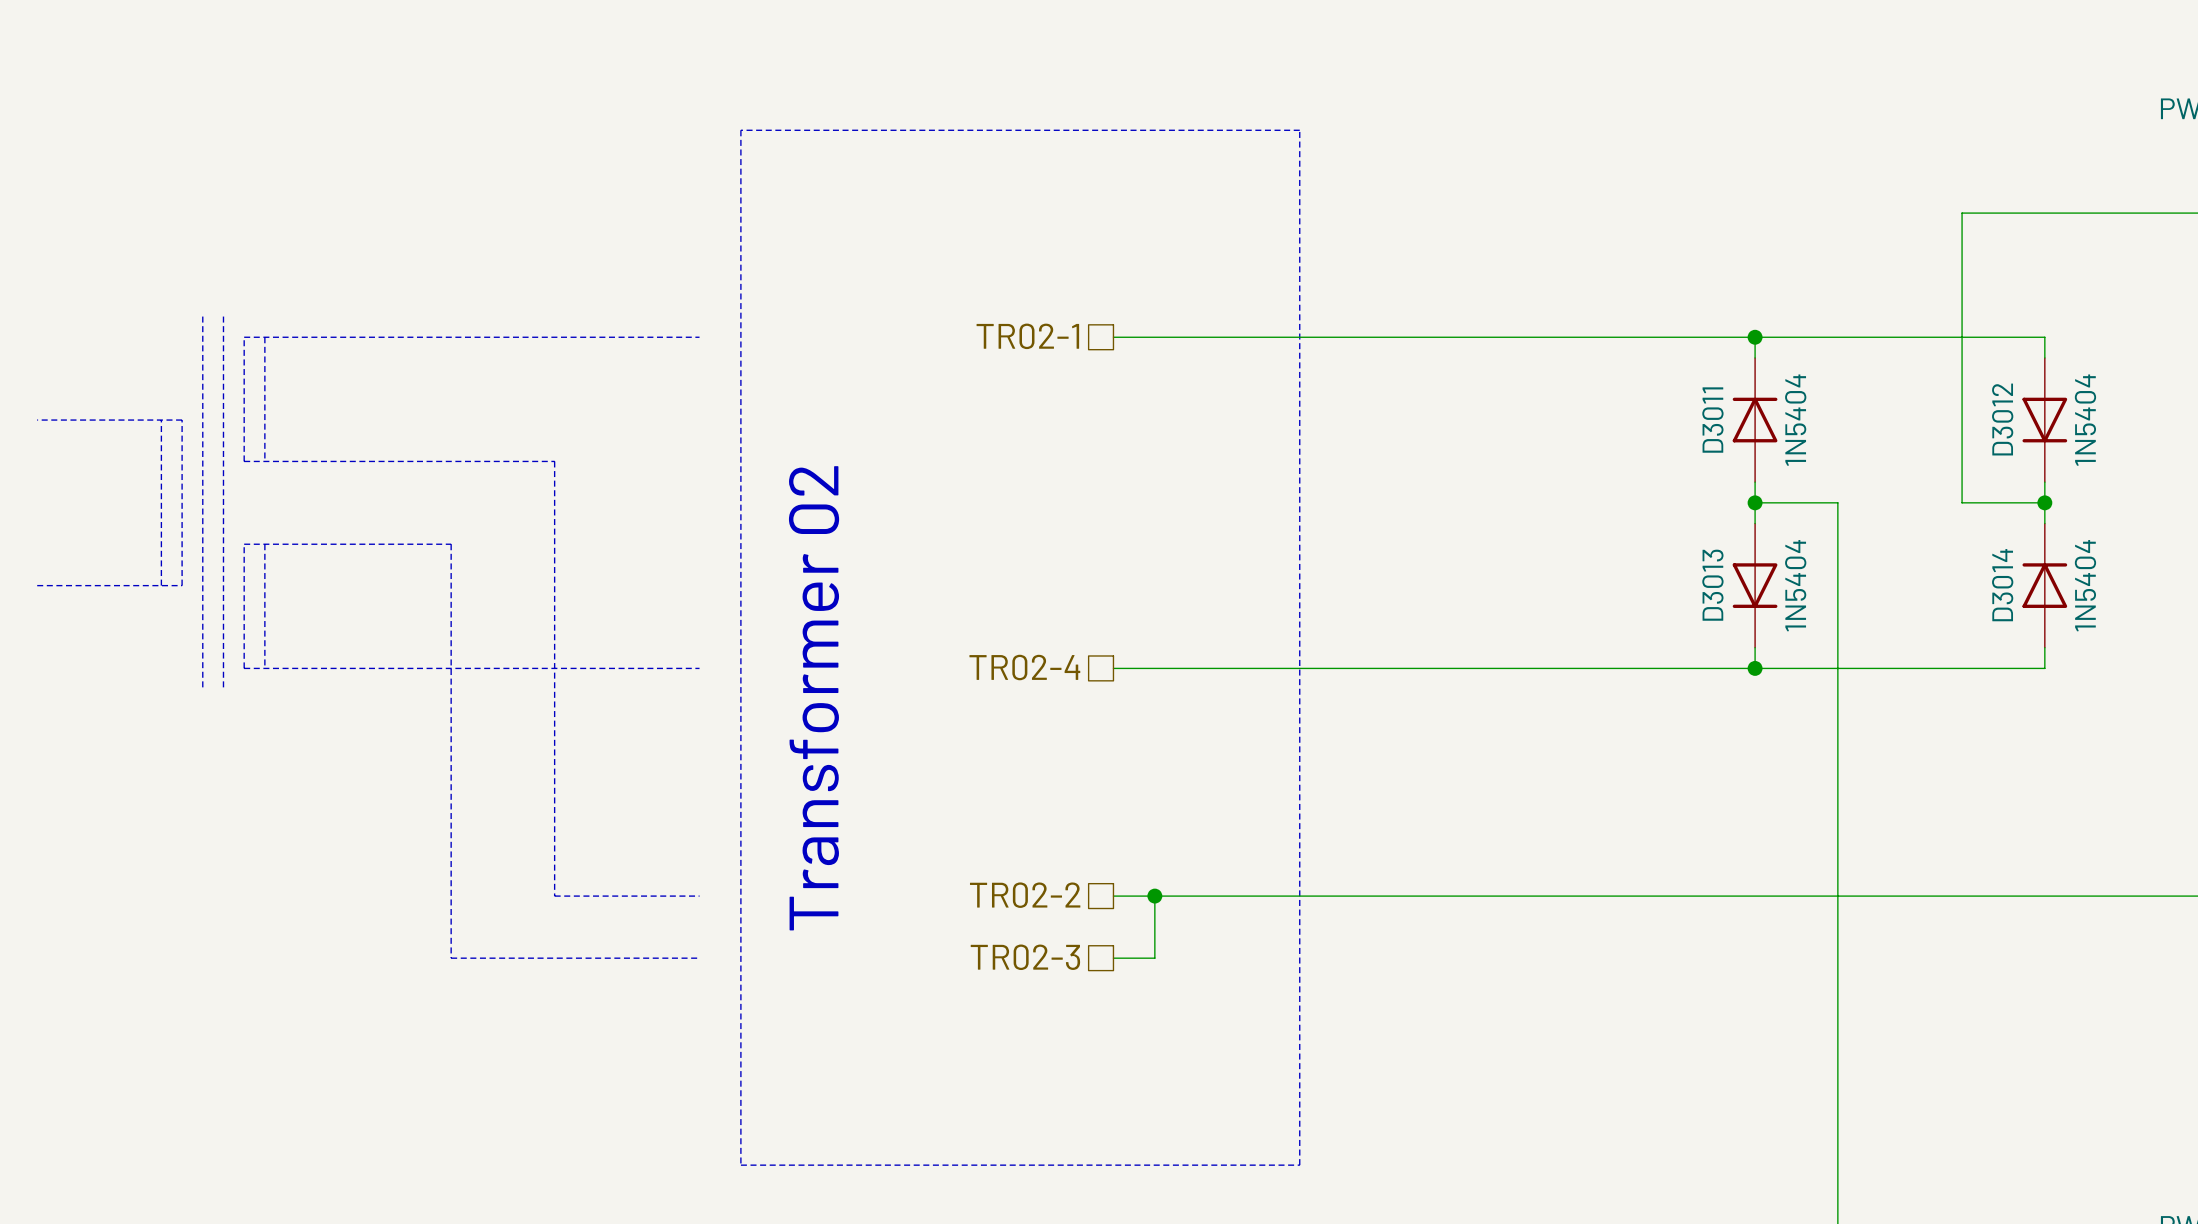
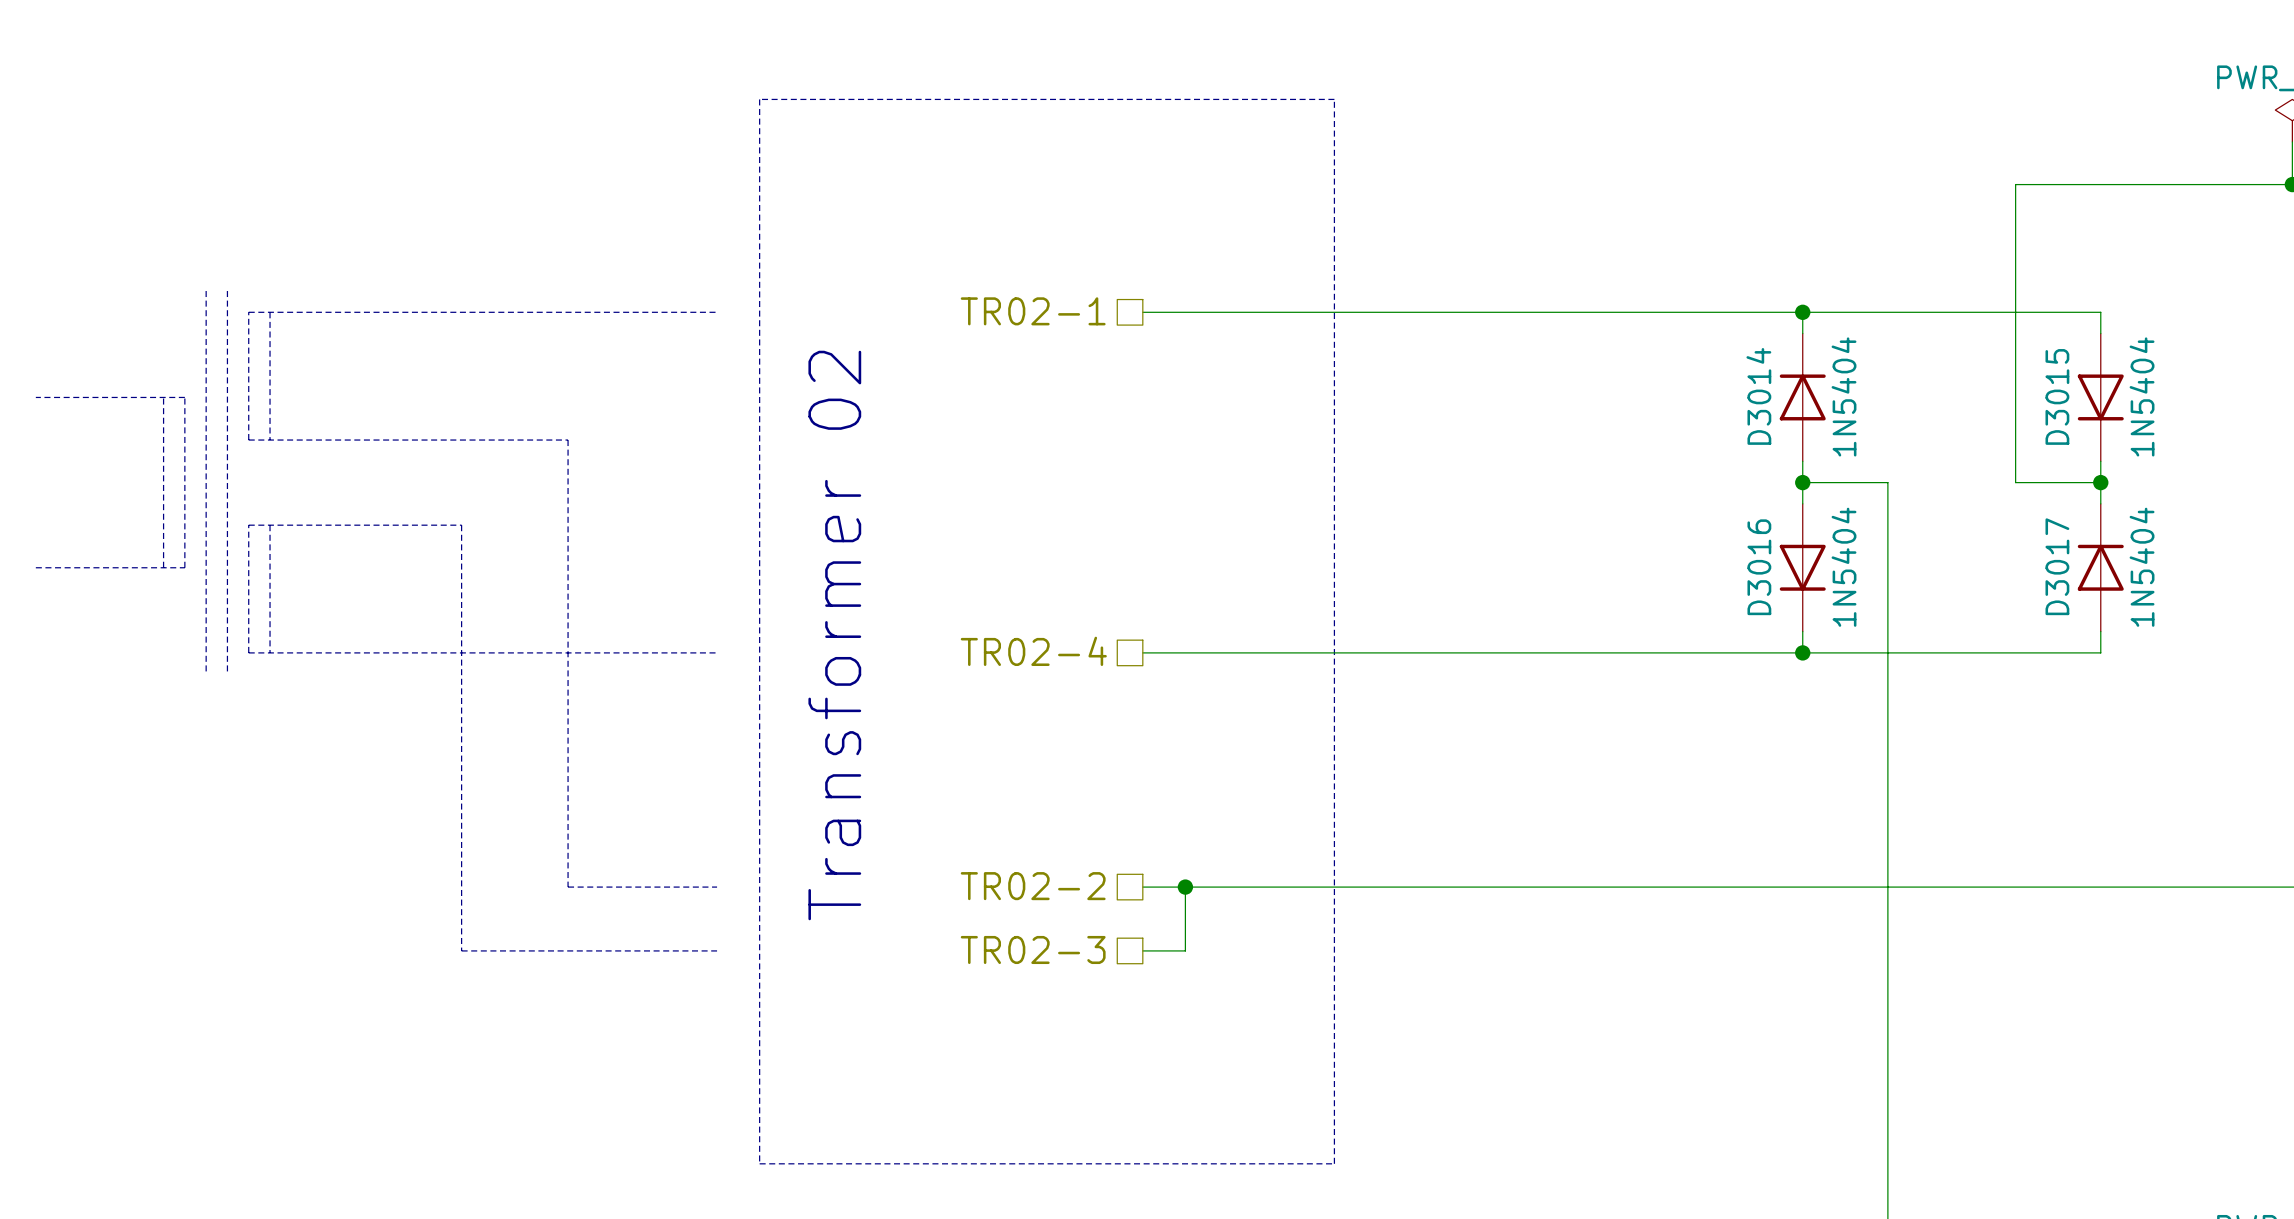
D3012 name: D3012 (2002, 419) -> D3015 (2057, 396)
D3011 name: D3011 (1712, 420) -> D3014 (1758, 396)
D3013 name: D3013 (1712, 585) -> D3016 (1759, 567)
D3014 name: D3014 (2002, 585) -> D3017 (2057, 566)

